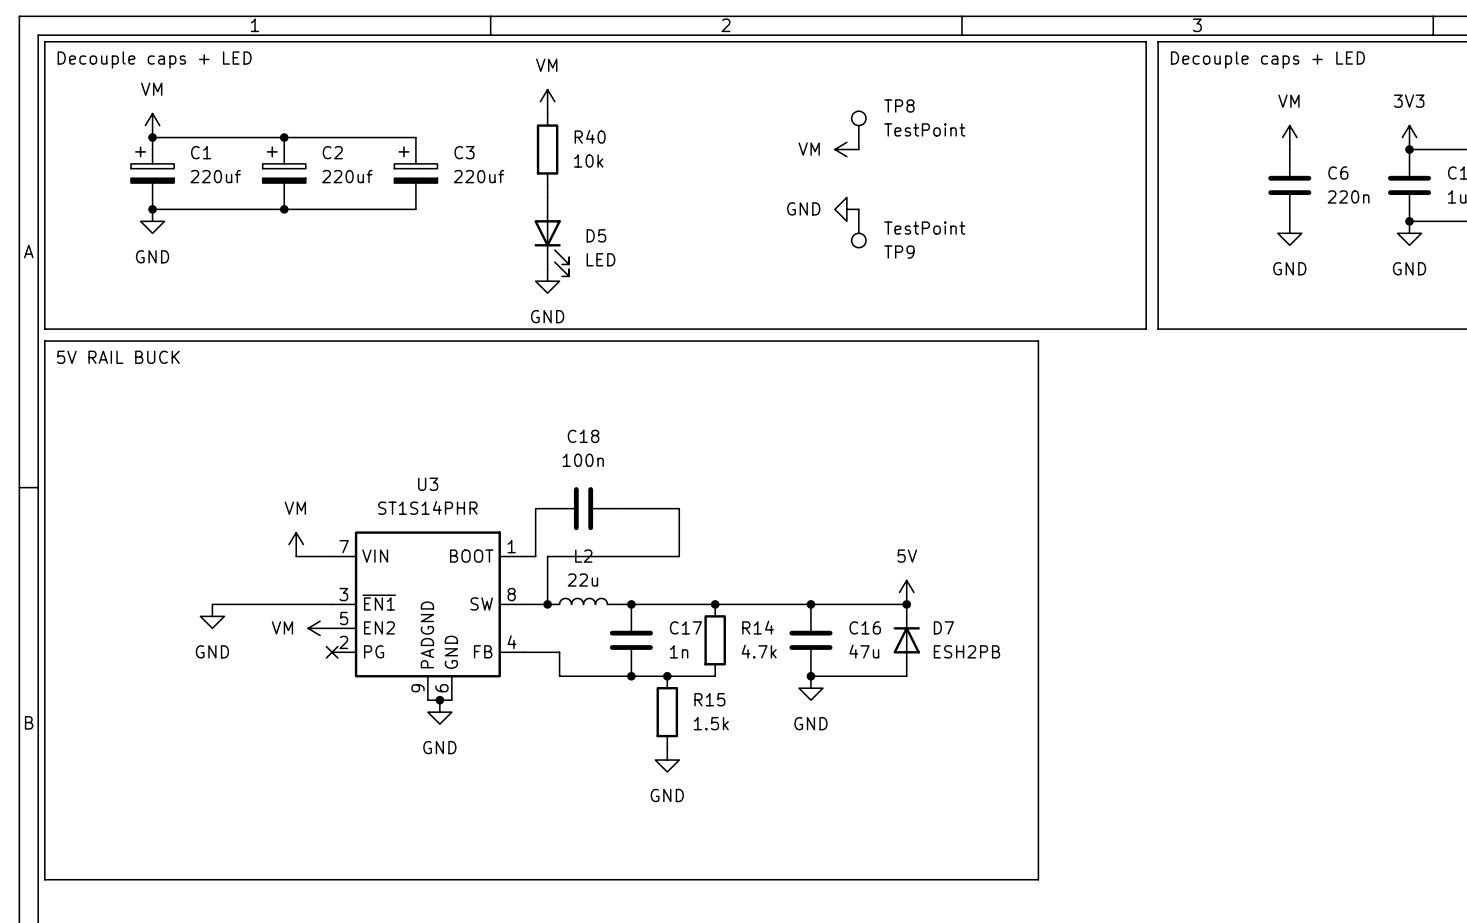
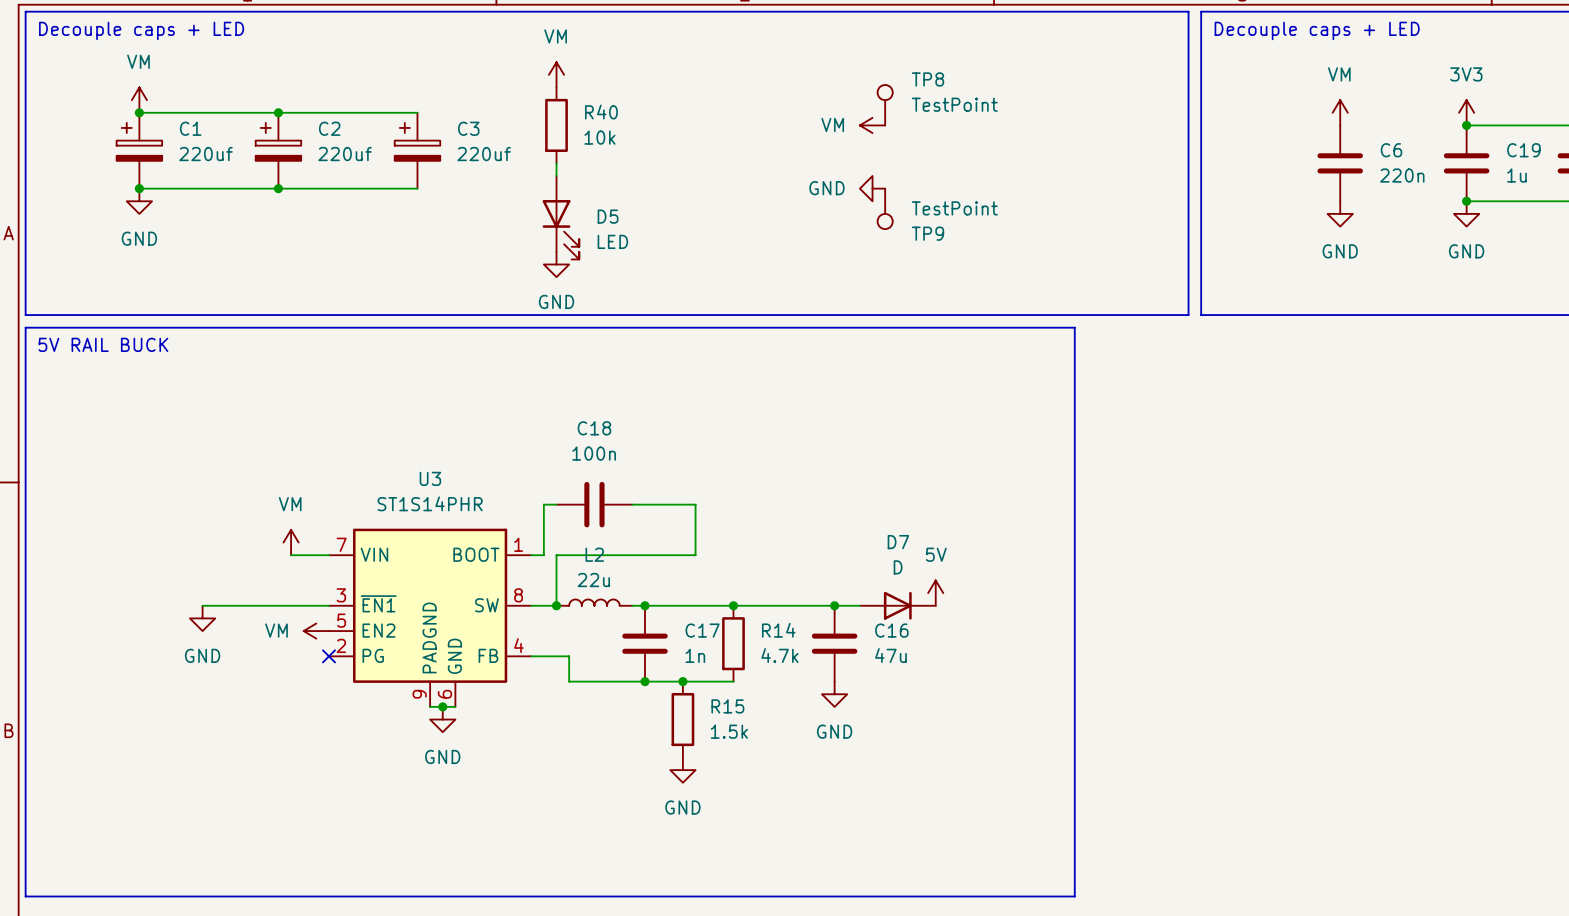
junction: (906, 604) -> none
D7 name position: D7 (943, 627) -> D7 (898, 542)
D7 rotation: 0° (906, 640) -> 90° clockwise (897, 605)
D7 position: (906, 640) -> (897, 605)
D7 value: ESH2PB (966, 651) -> D (898, 567)
wire: (810, 676) (906, 676) -> none
junction: (810, 676) -> none

